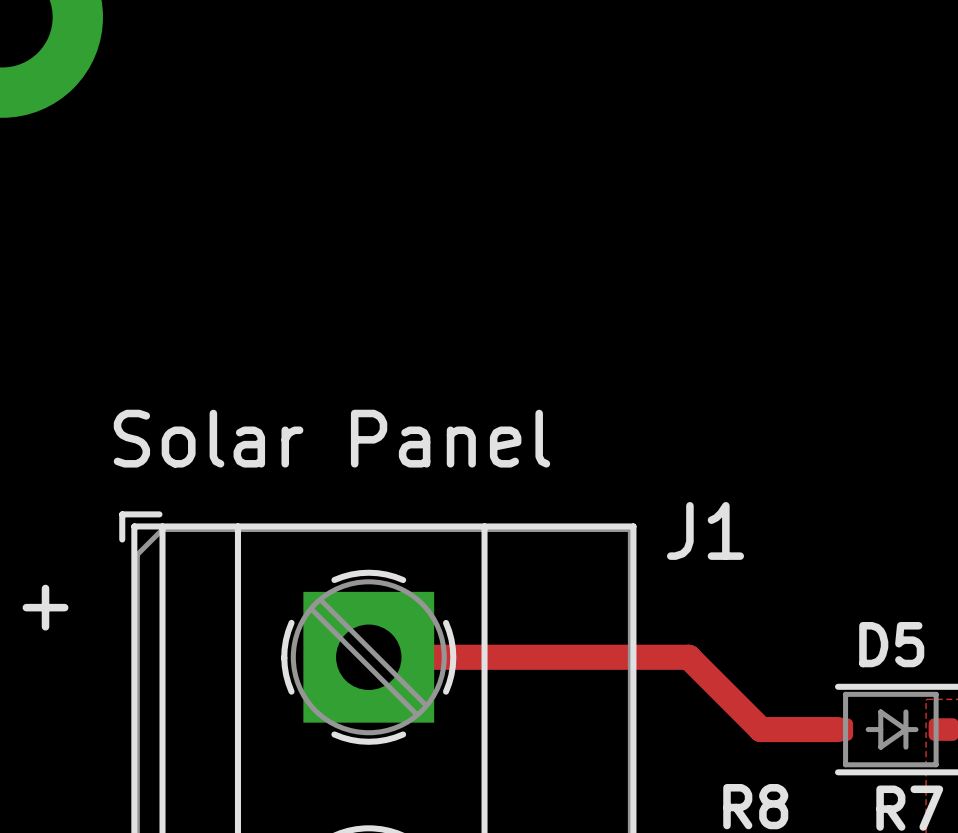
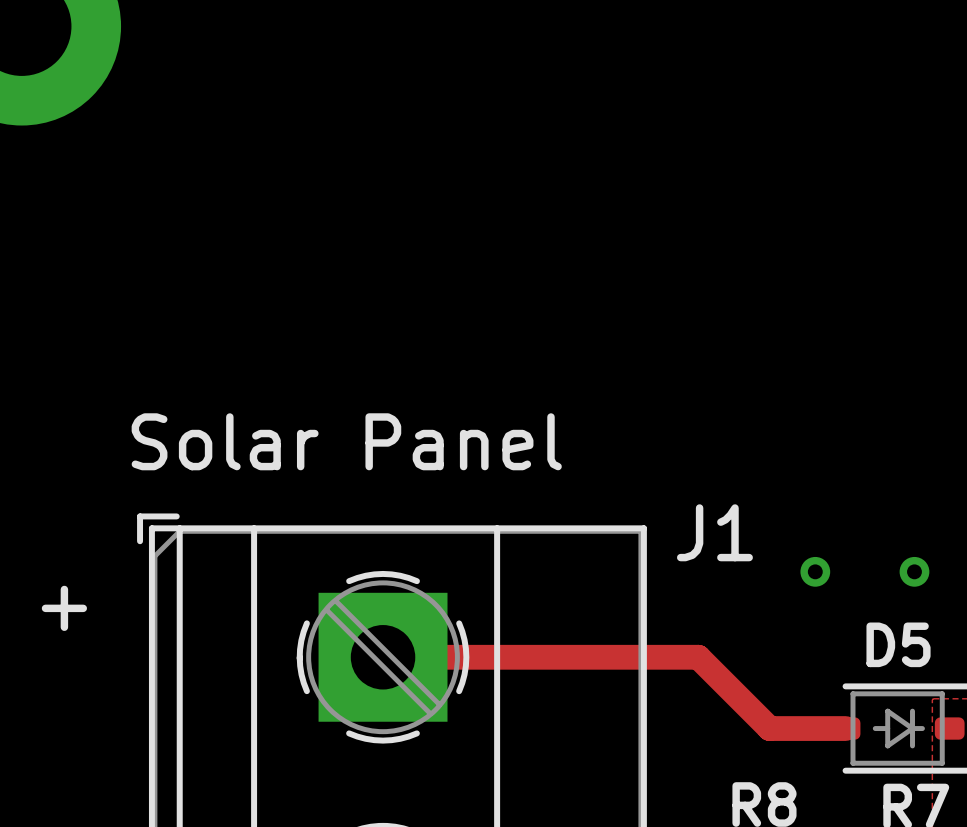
via: none -> (815, 571)
via: none -> (914, 571)

